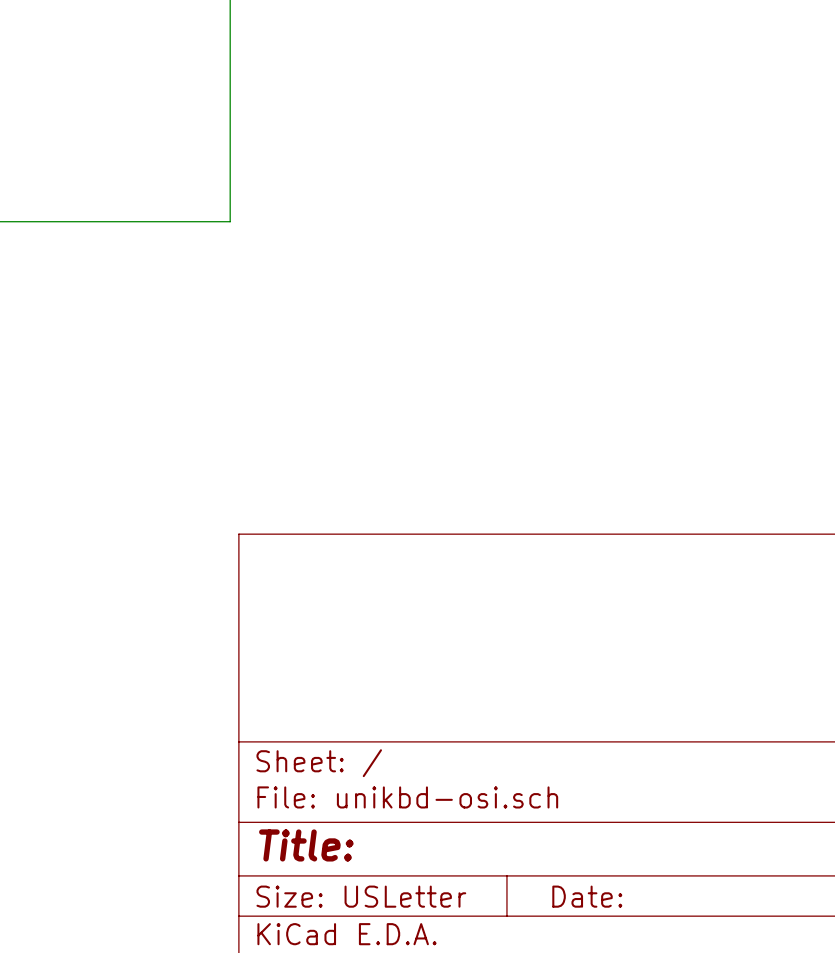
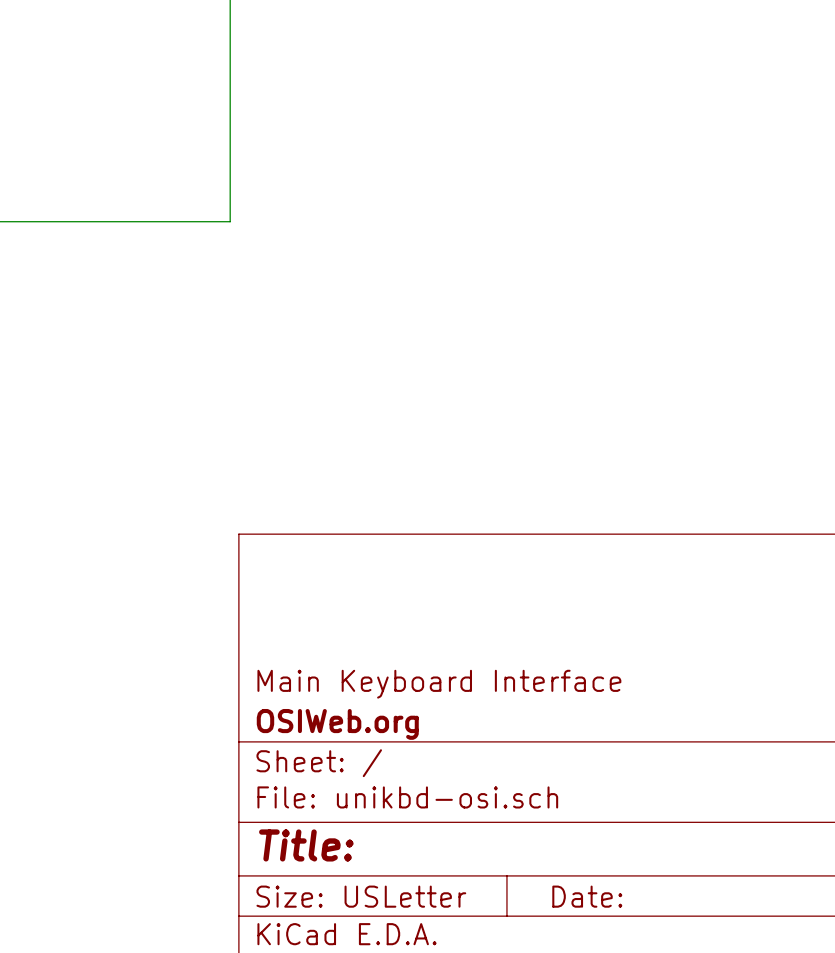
title block: none -> Main Keyboard Interface (439, 684)
title block: none -> OSIWeb.org (337, 724)

